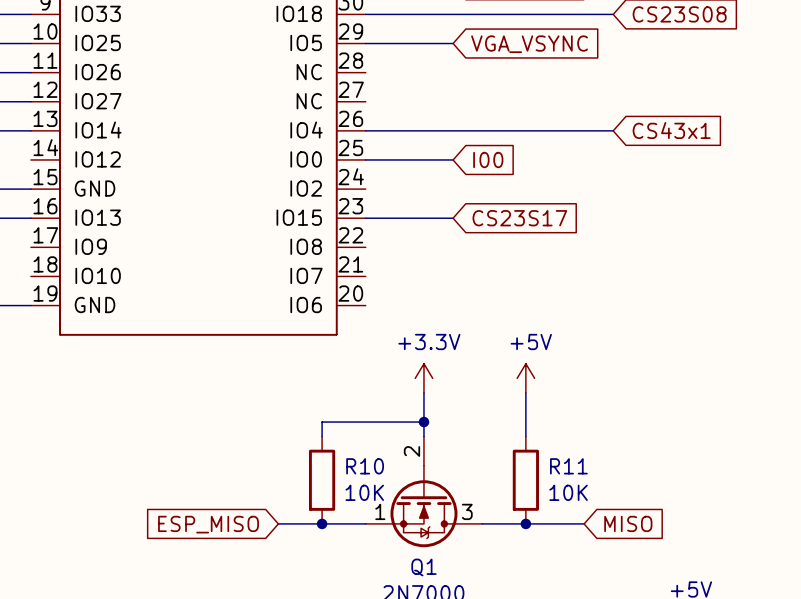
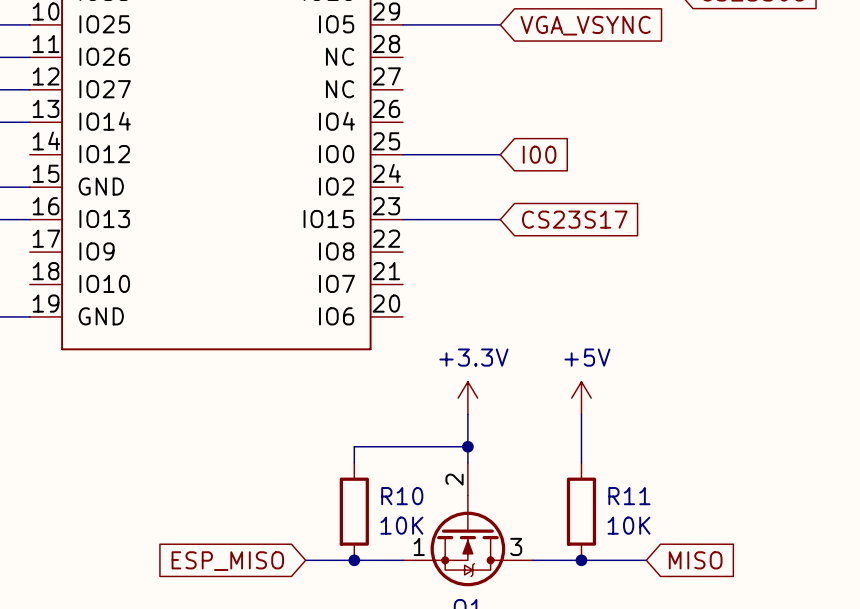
wire: (365, 130) (613, 130) -> none
global label: CS43x1 (671, 130) -> none

